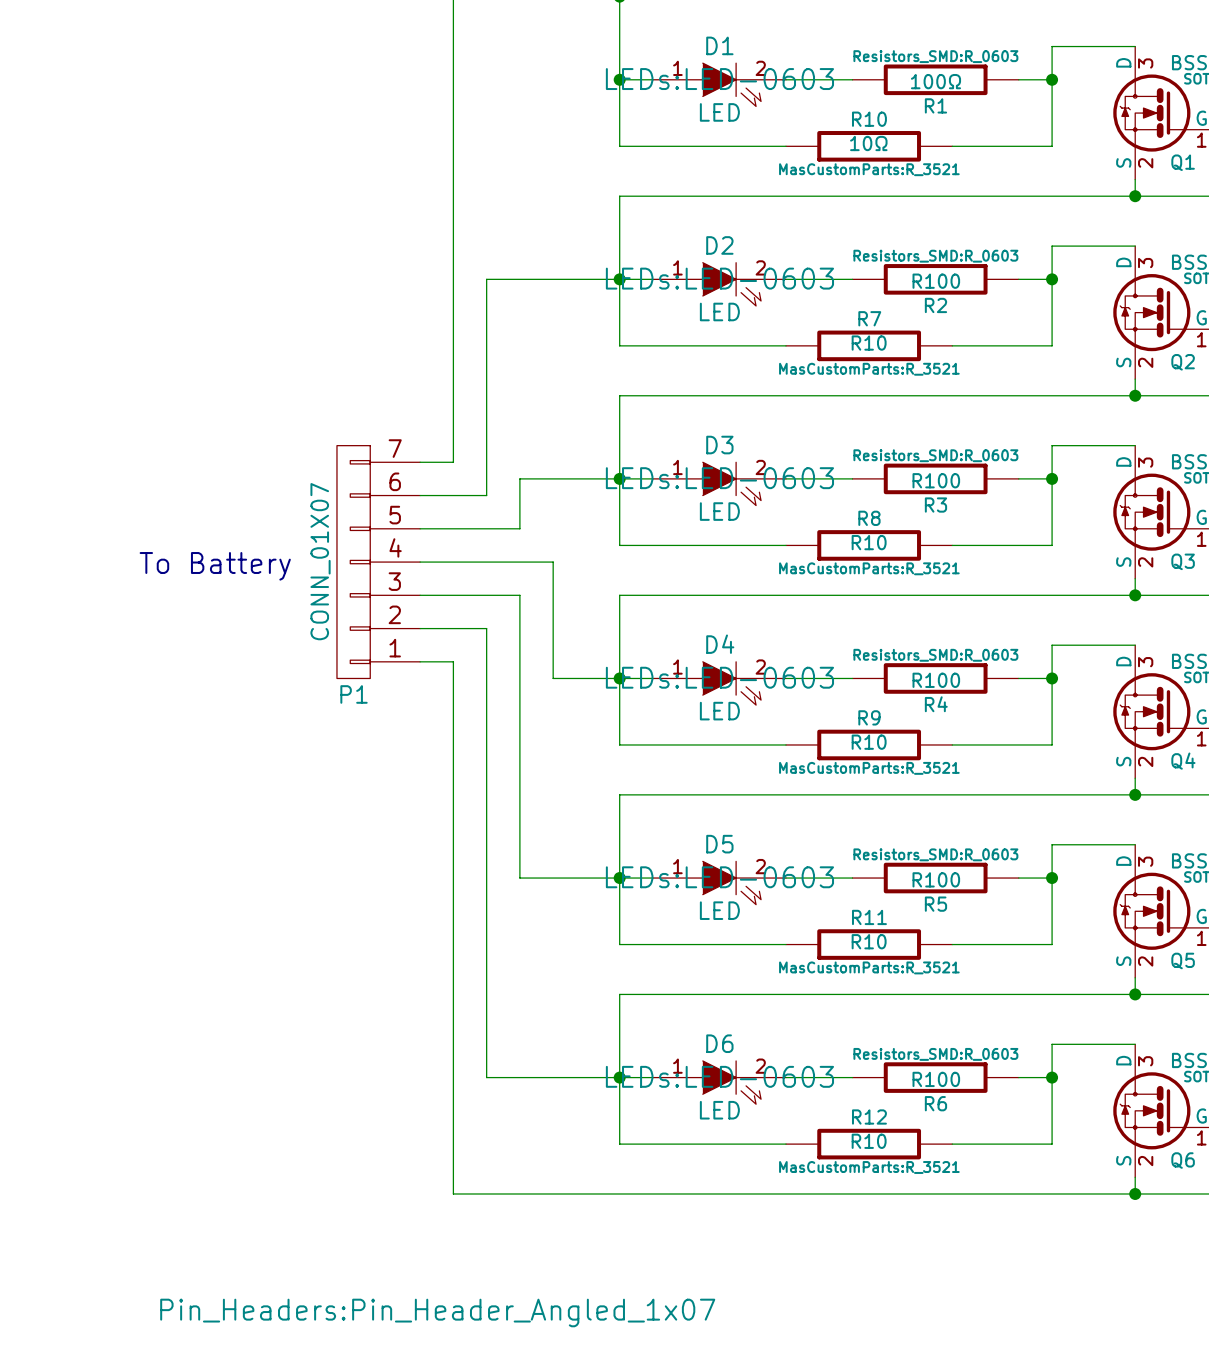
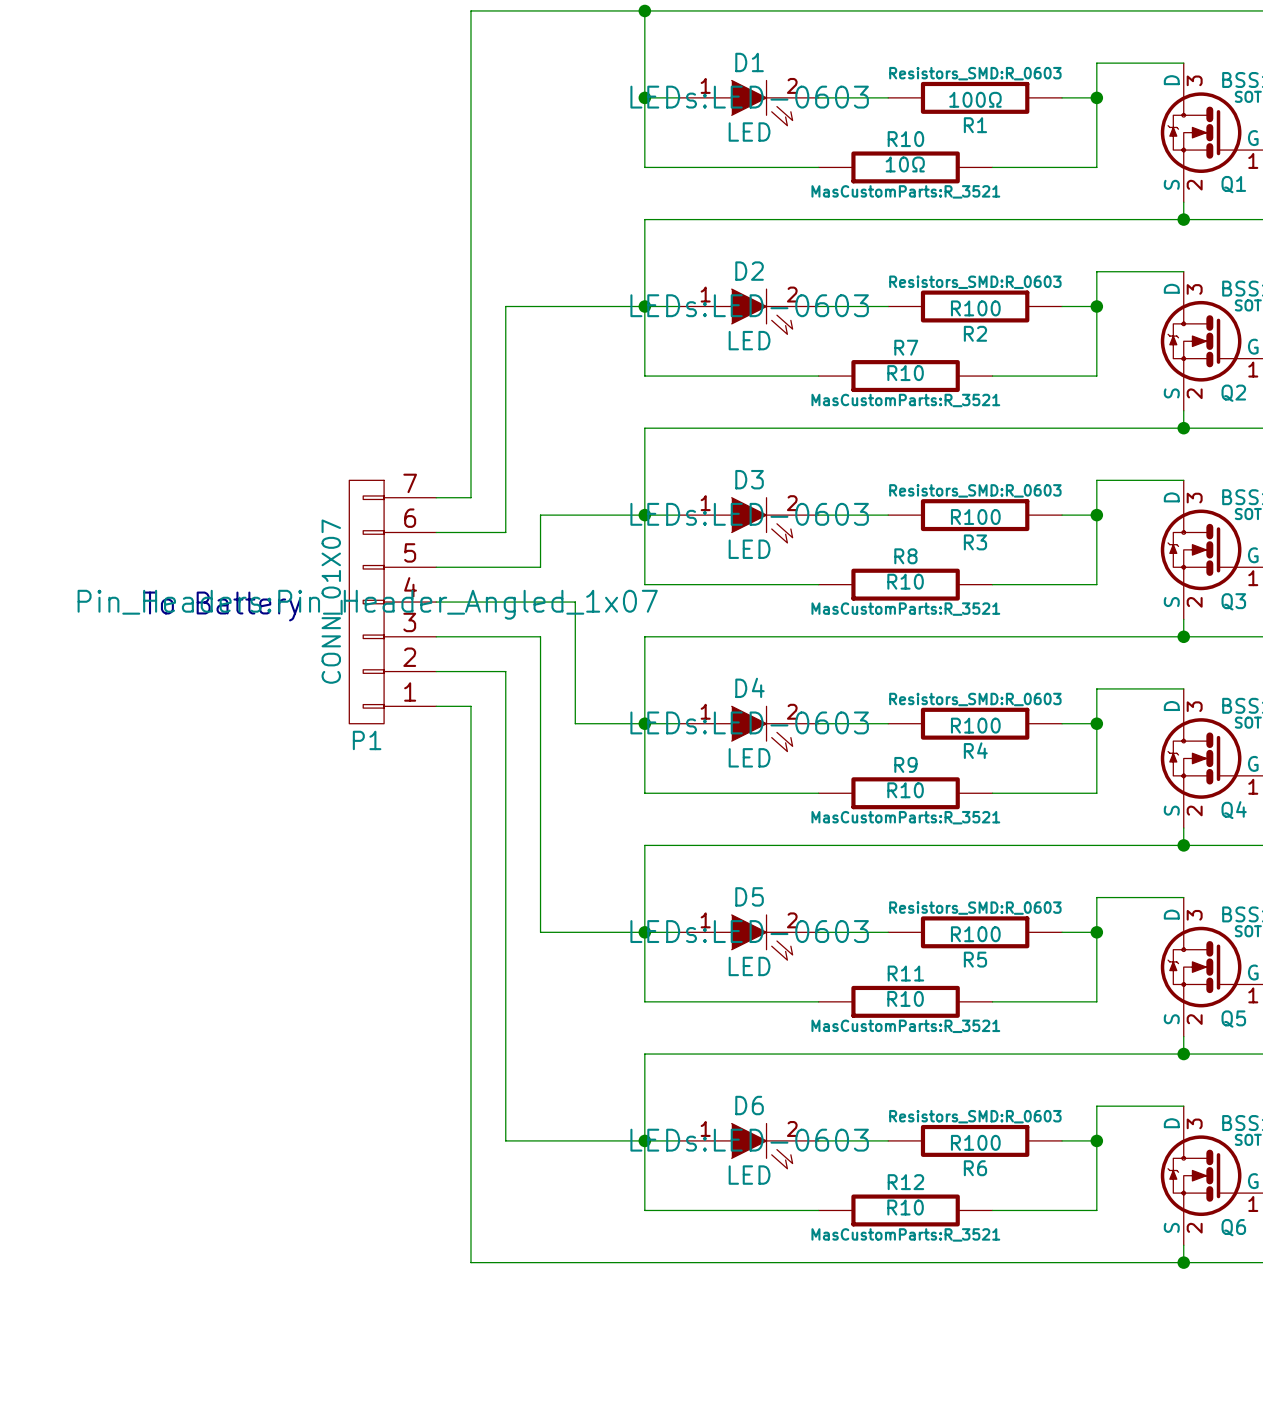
P1 text position: Pin_Headers:Pin_Header_Angled_1x07 (437, 1312) -> Pin_Headers:Pin_Header_Angled_1x07 (367, 604)

